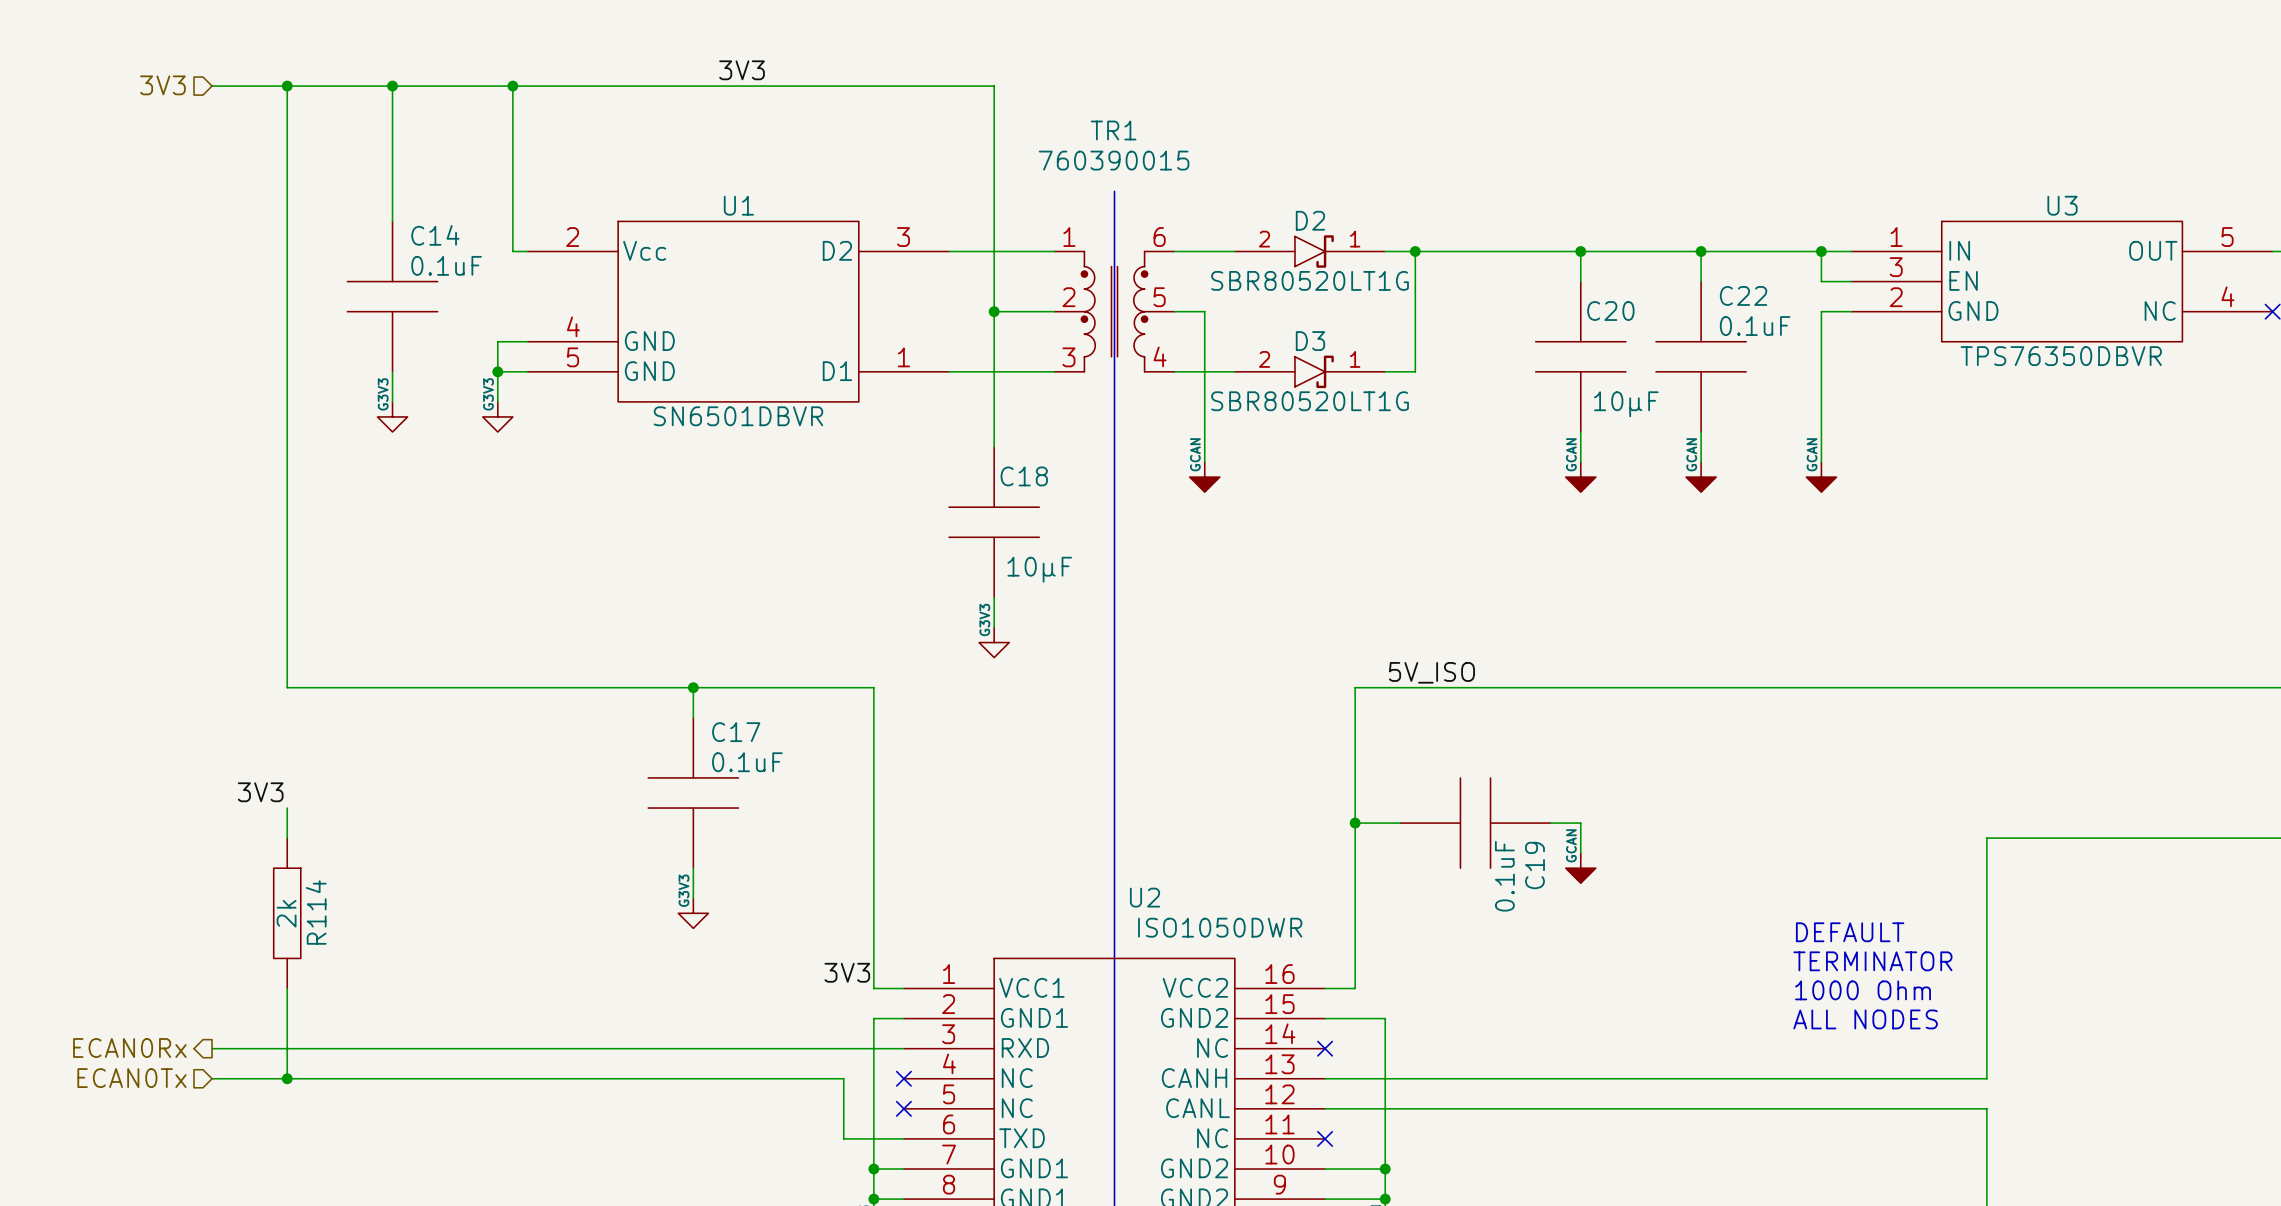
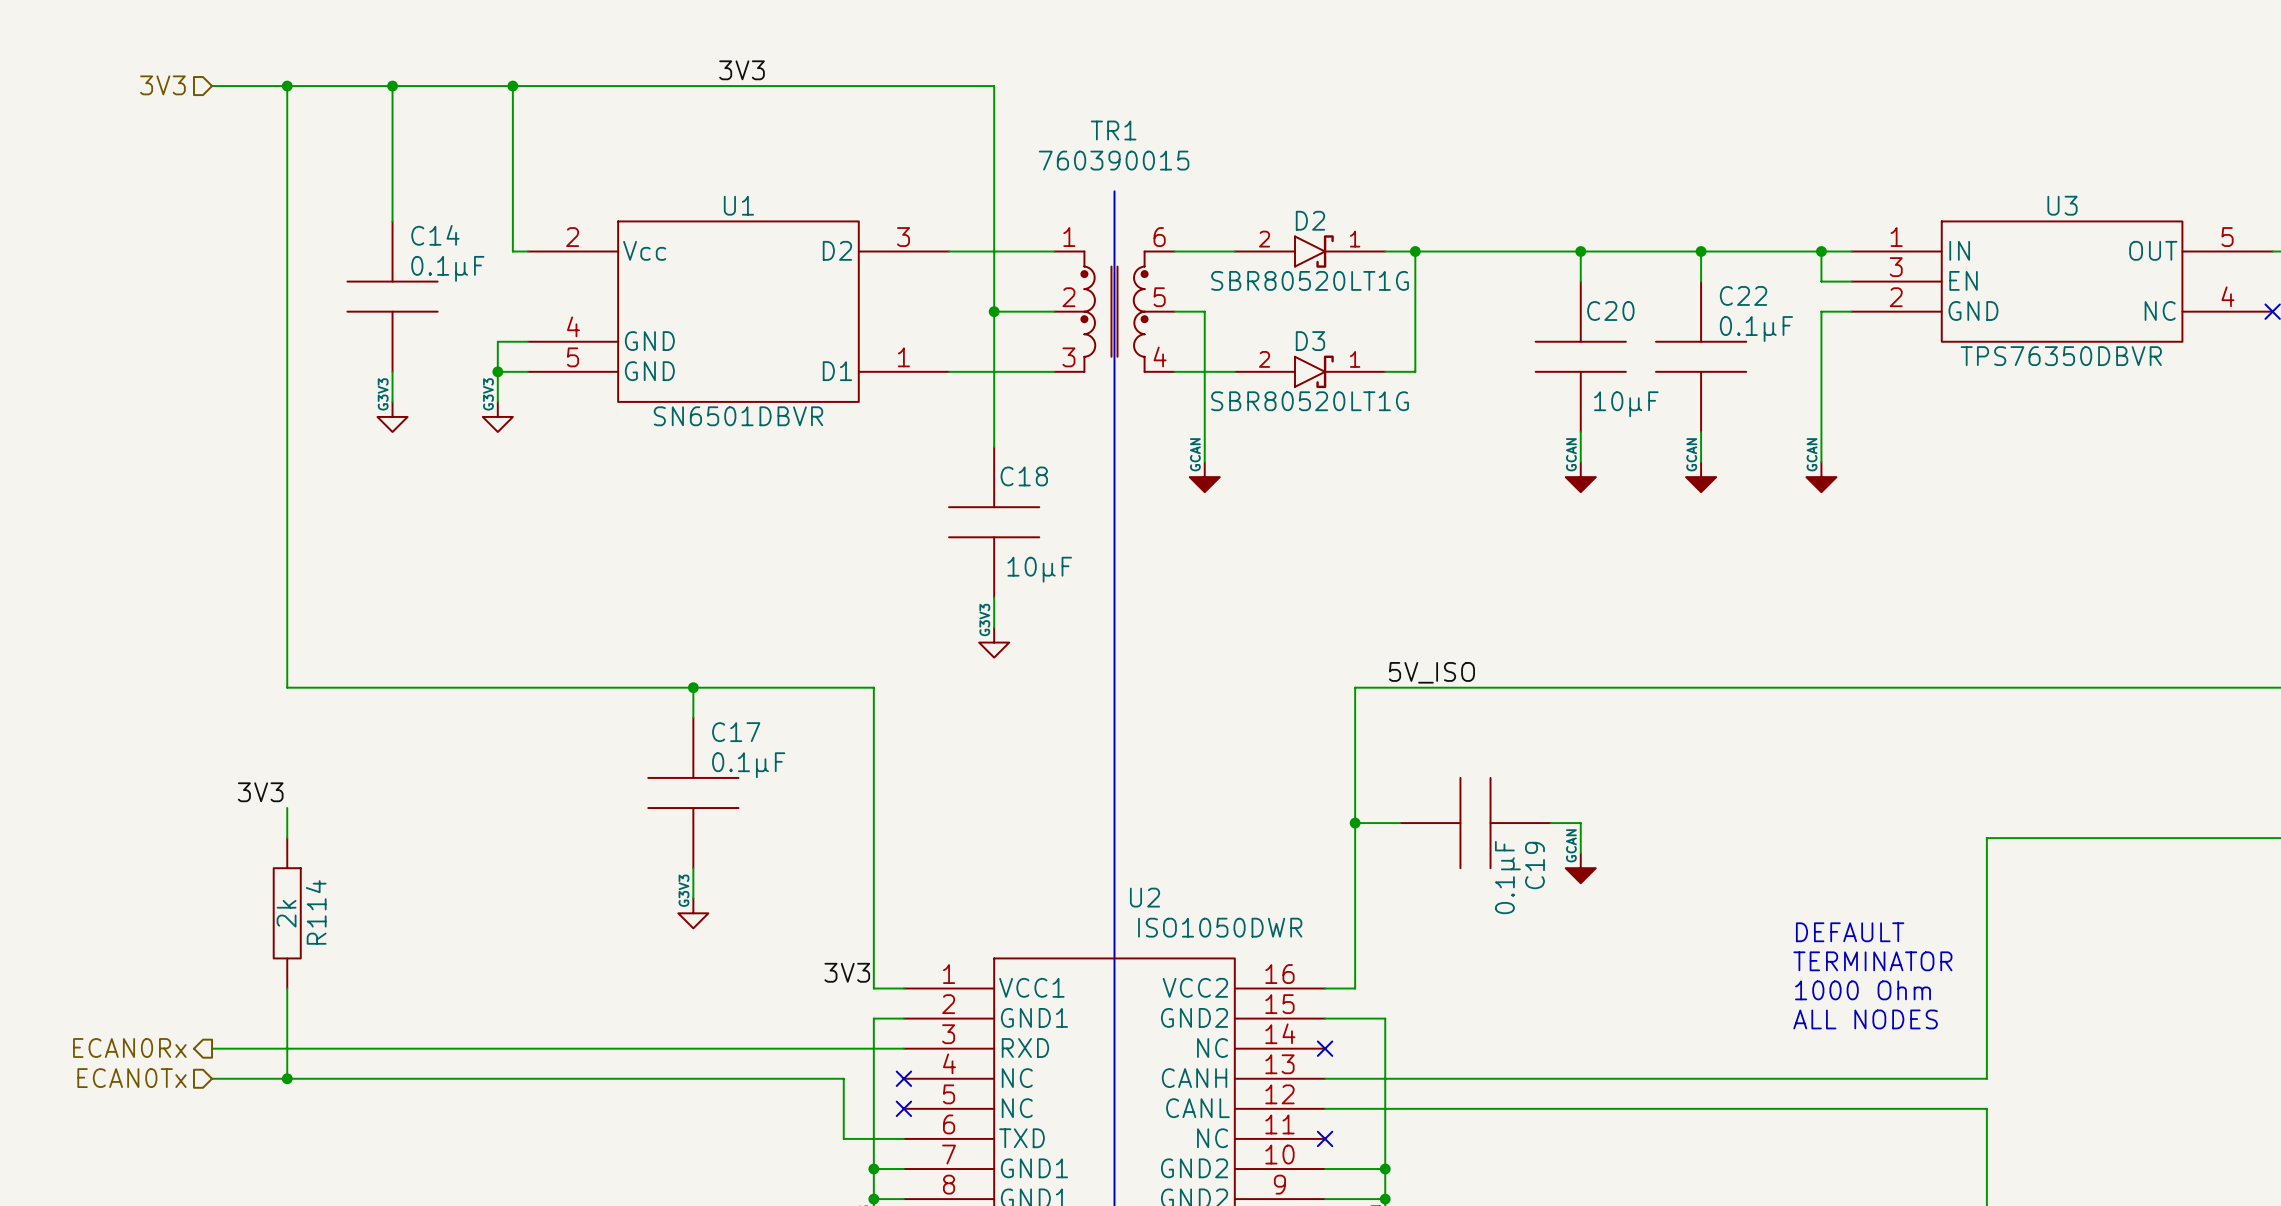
C14 text: 0.1uF (446, 265) -> 0.1µF (447, 268)
C22 text: 0.1uF (1755, 326) -> 0.1µF (1756, 329)
C17 text: 0.1uF (747, 762) -> 0.1µF (748, 765)
C19 text: 0.1uF (1504, 876) -> 0.1µF (1507, 877)

